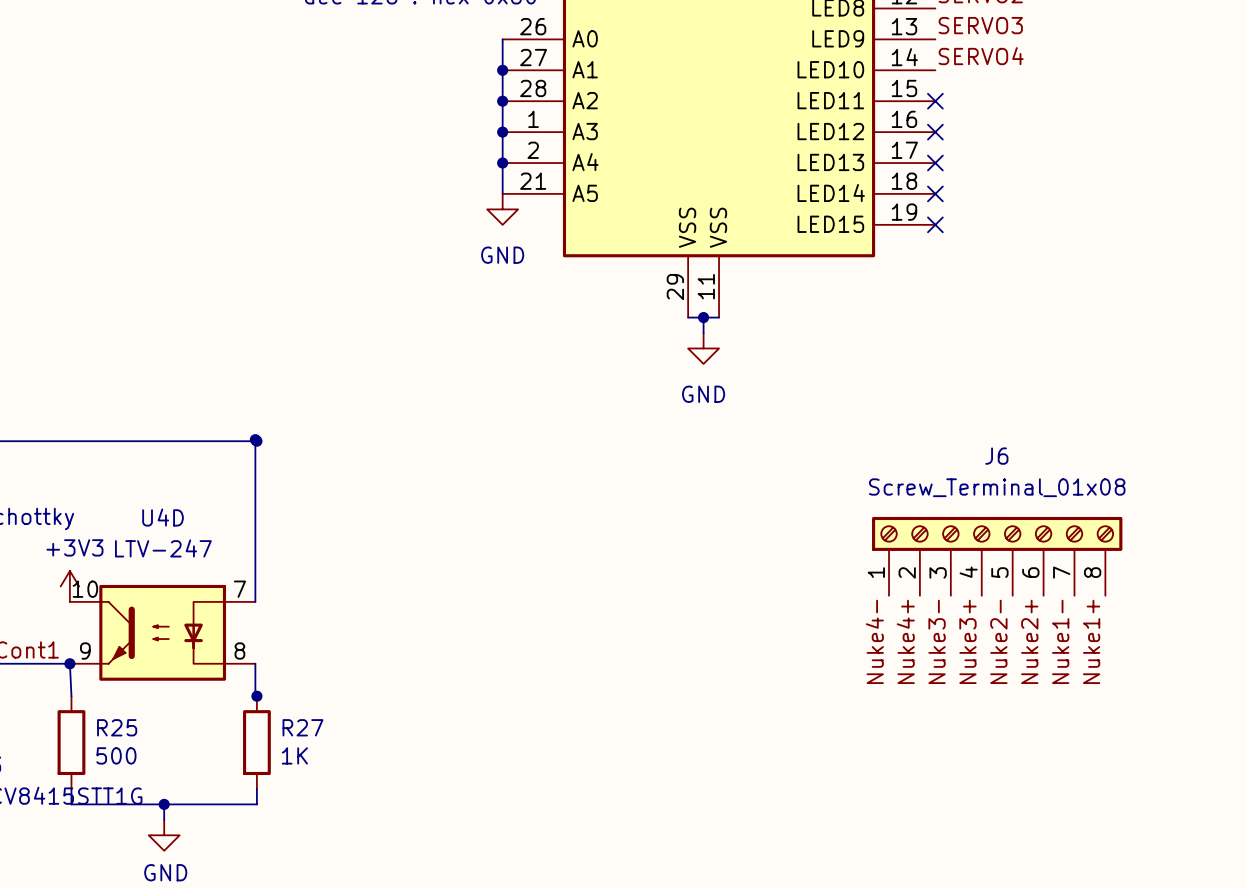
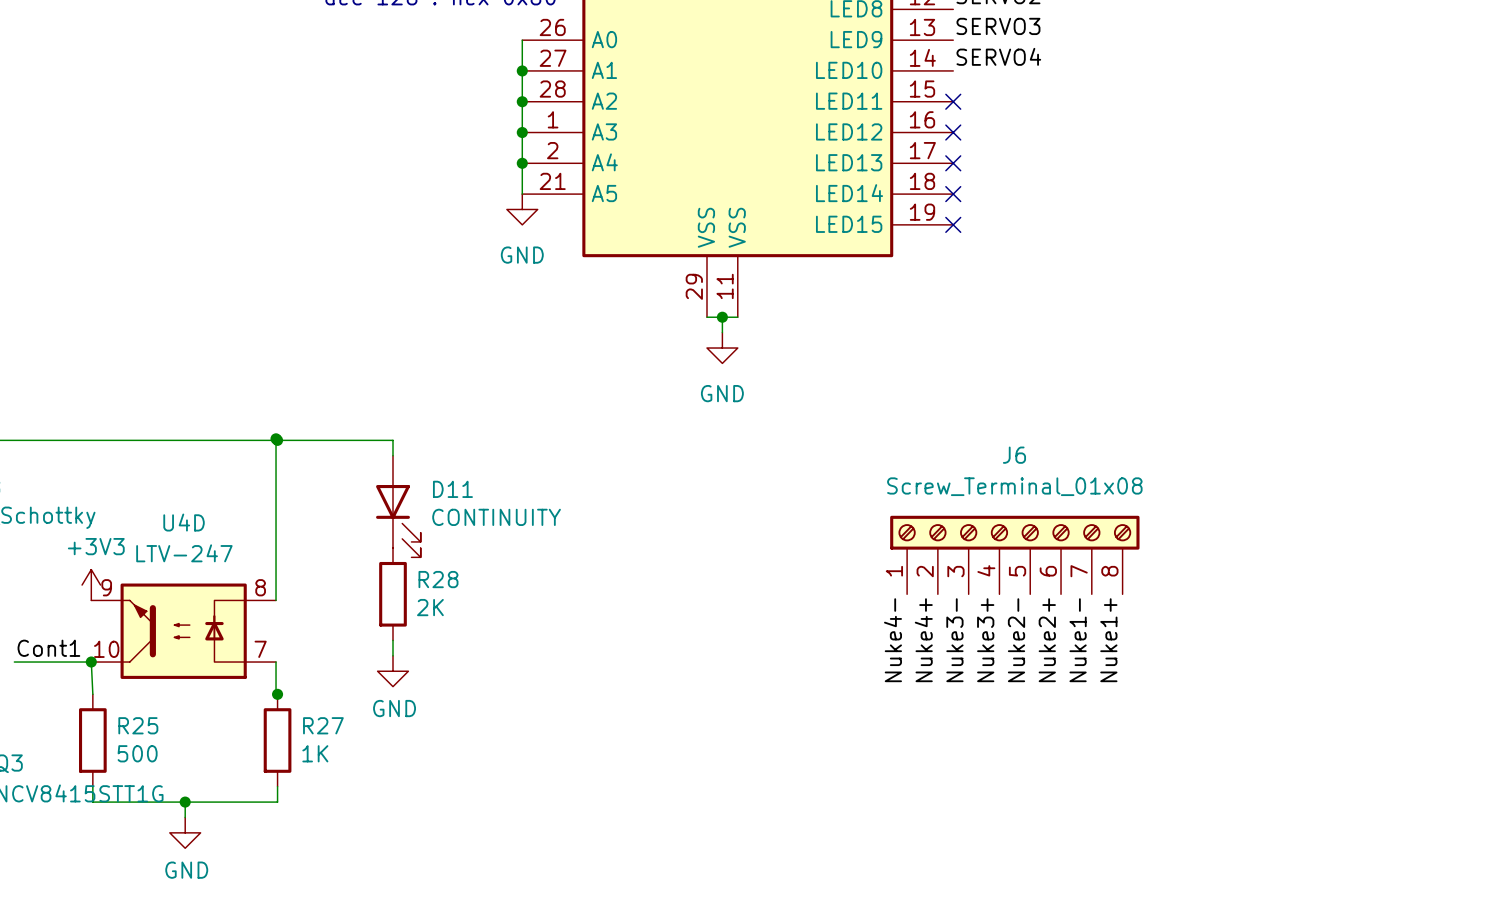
wire: none -> (277, 440) (393, 440) (393, 455)
D11: none -> CONTINUITY (398, 506)
R28: none -> 2K (393, 594)
U4D flip: as is (162, 632) -> up-down (183, 631)
wire: none -> (393, 640) (393, 655)
power symbol: none -> GND (393, 671)

